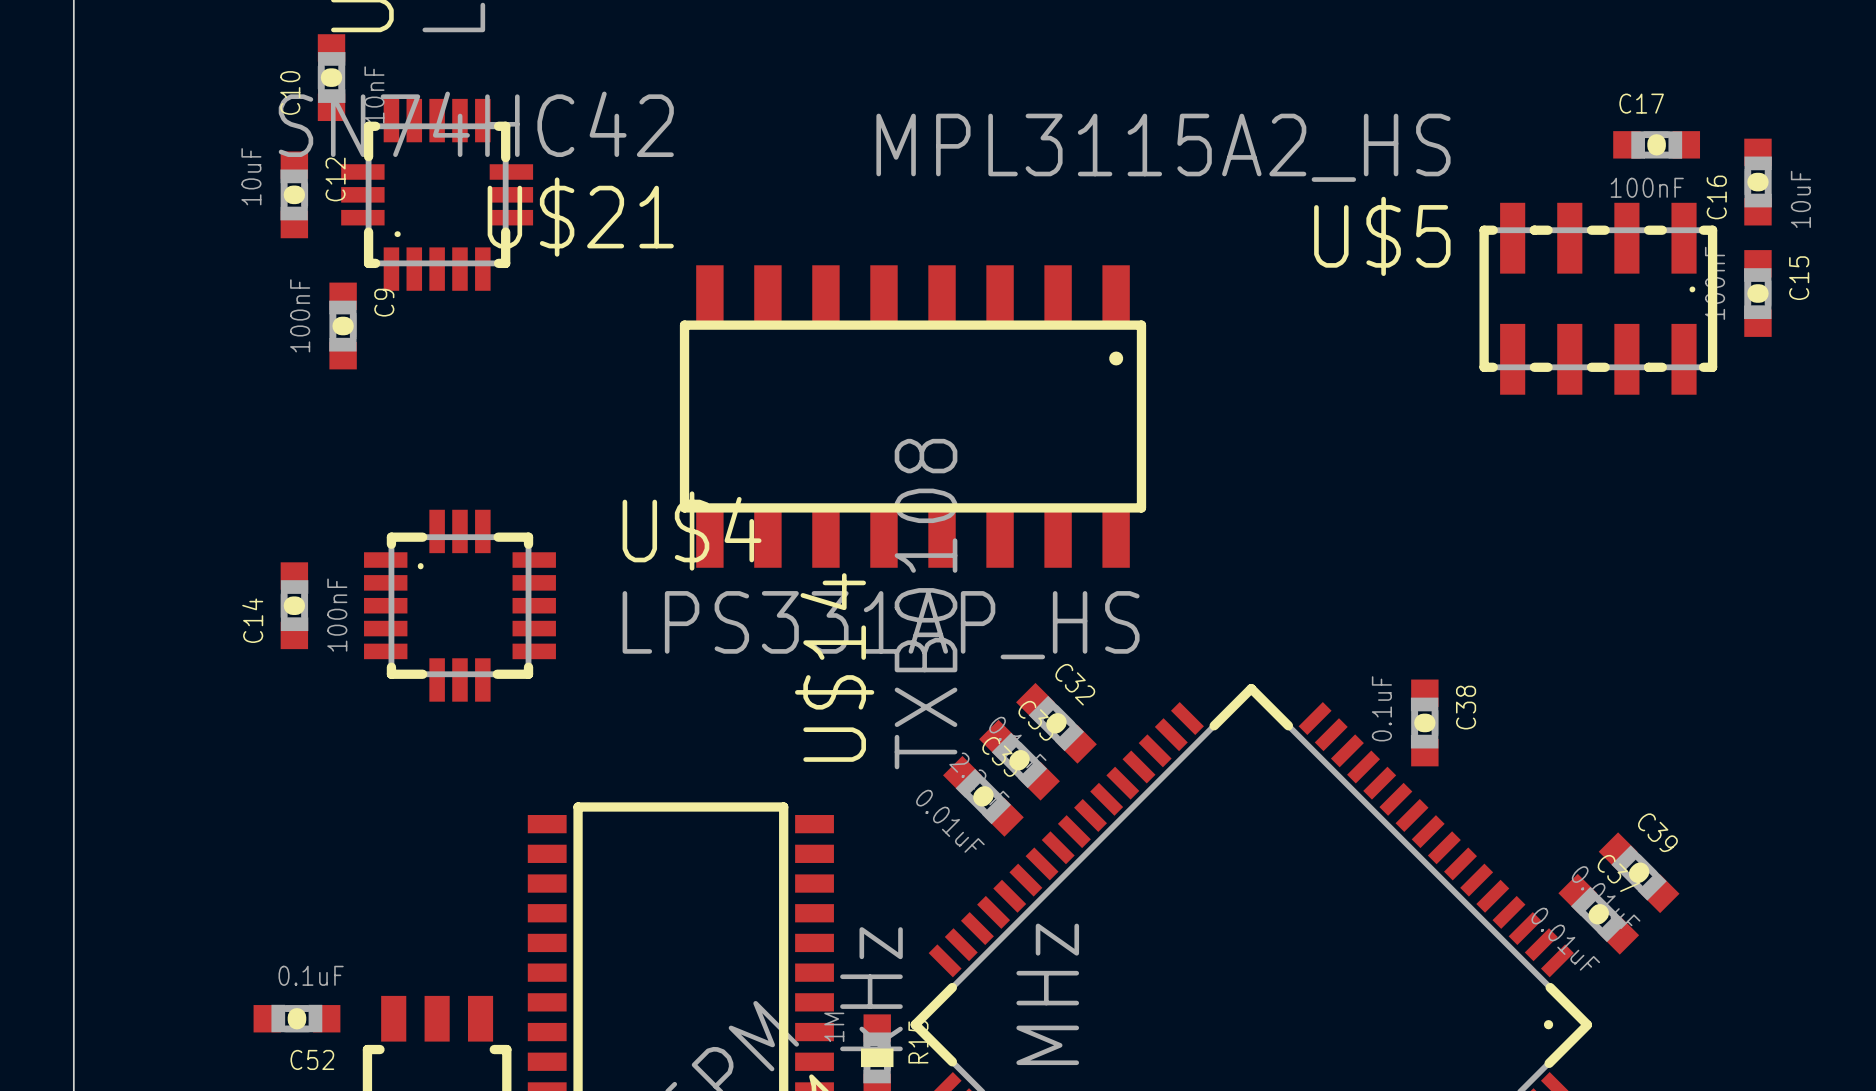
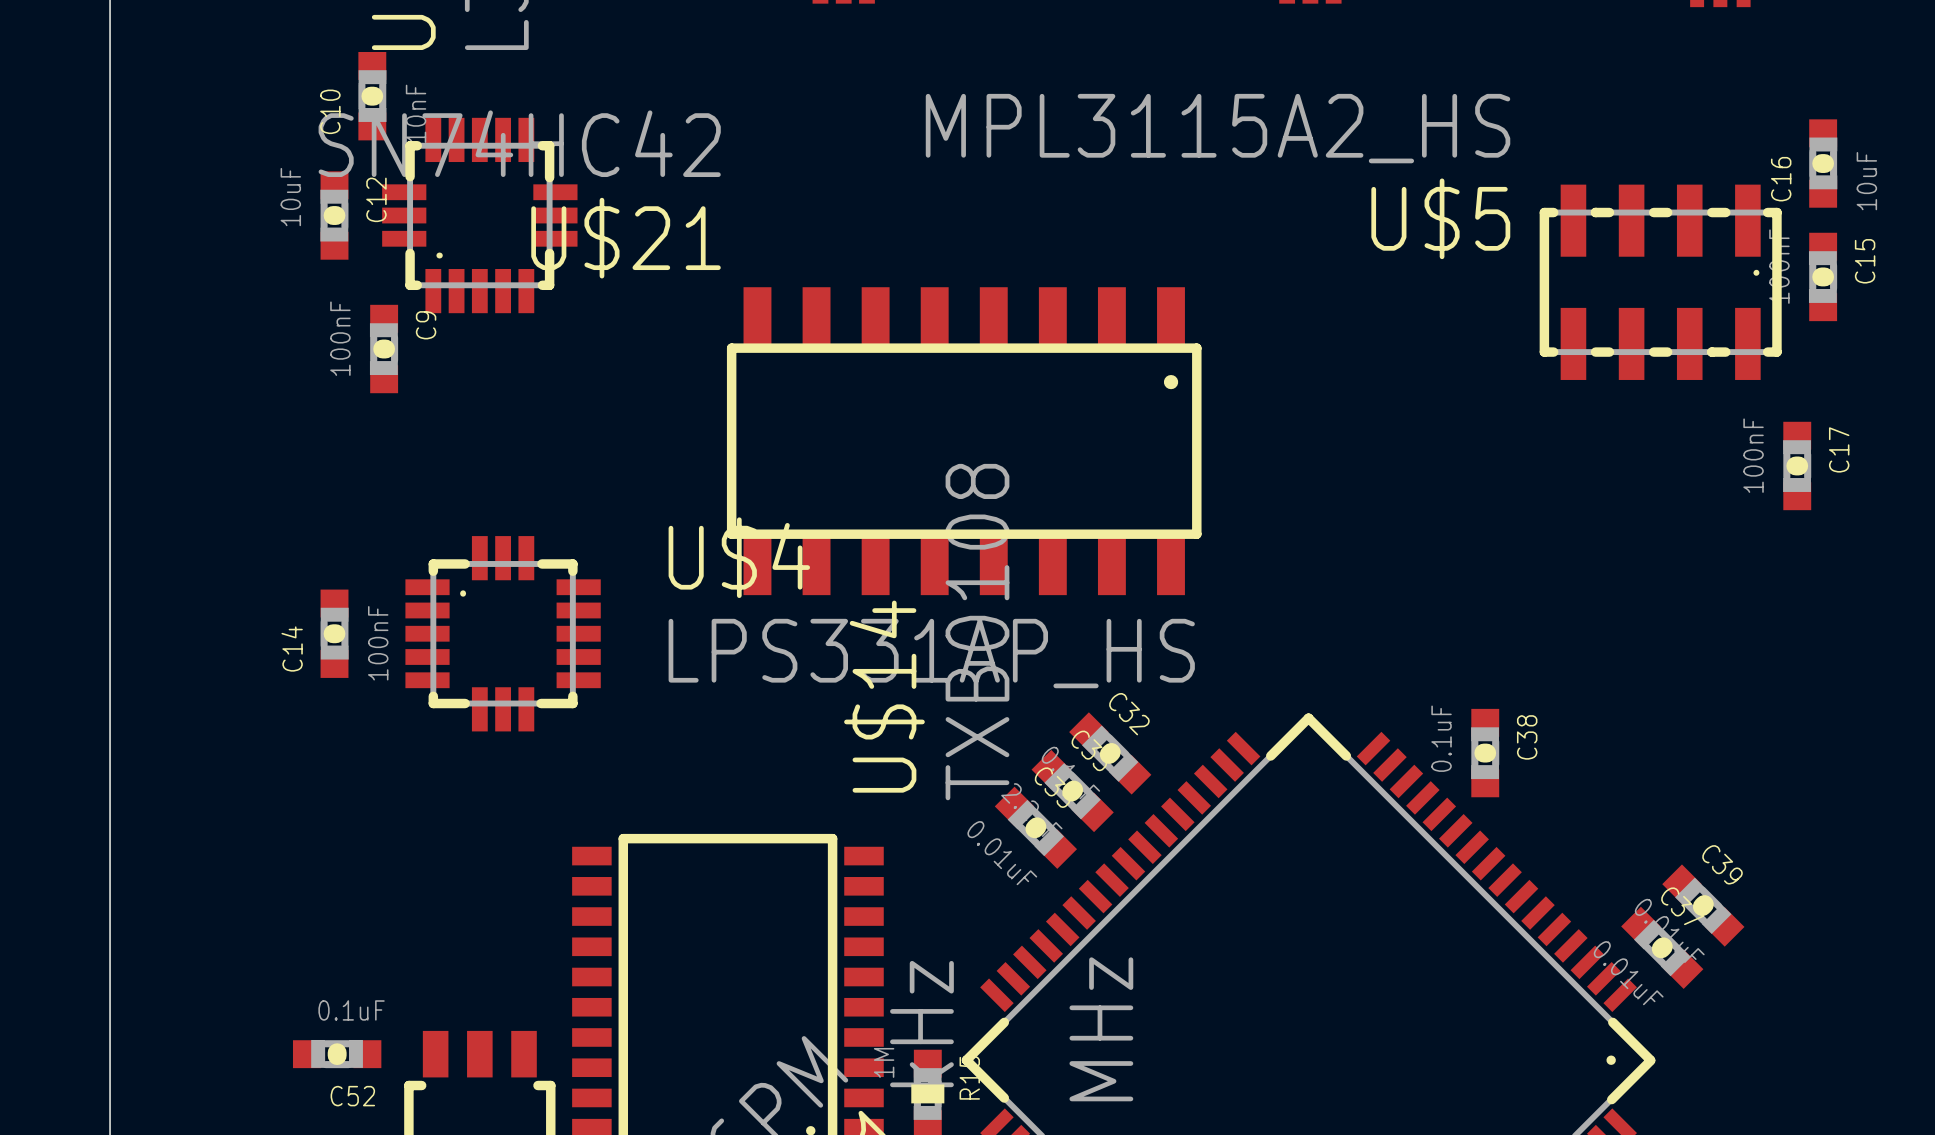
C17 rotation: 0° (1656, 144) -> 90° clockwise (1797, 465)
C17 position: (1656, 144) -> (1797, 465)
C16 position: (1758, 182) -> (1823, 163)
C15 position: (1757, 293) -> (1823, 276)
U$5 position: (1598, 298) -> (1660, 282)

